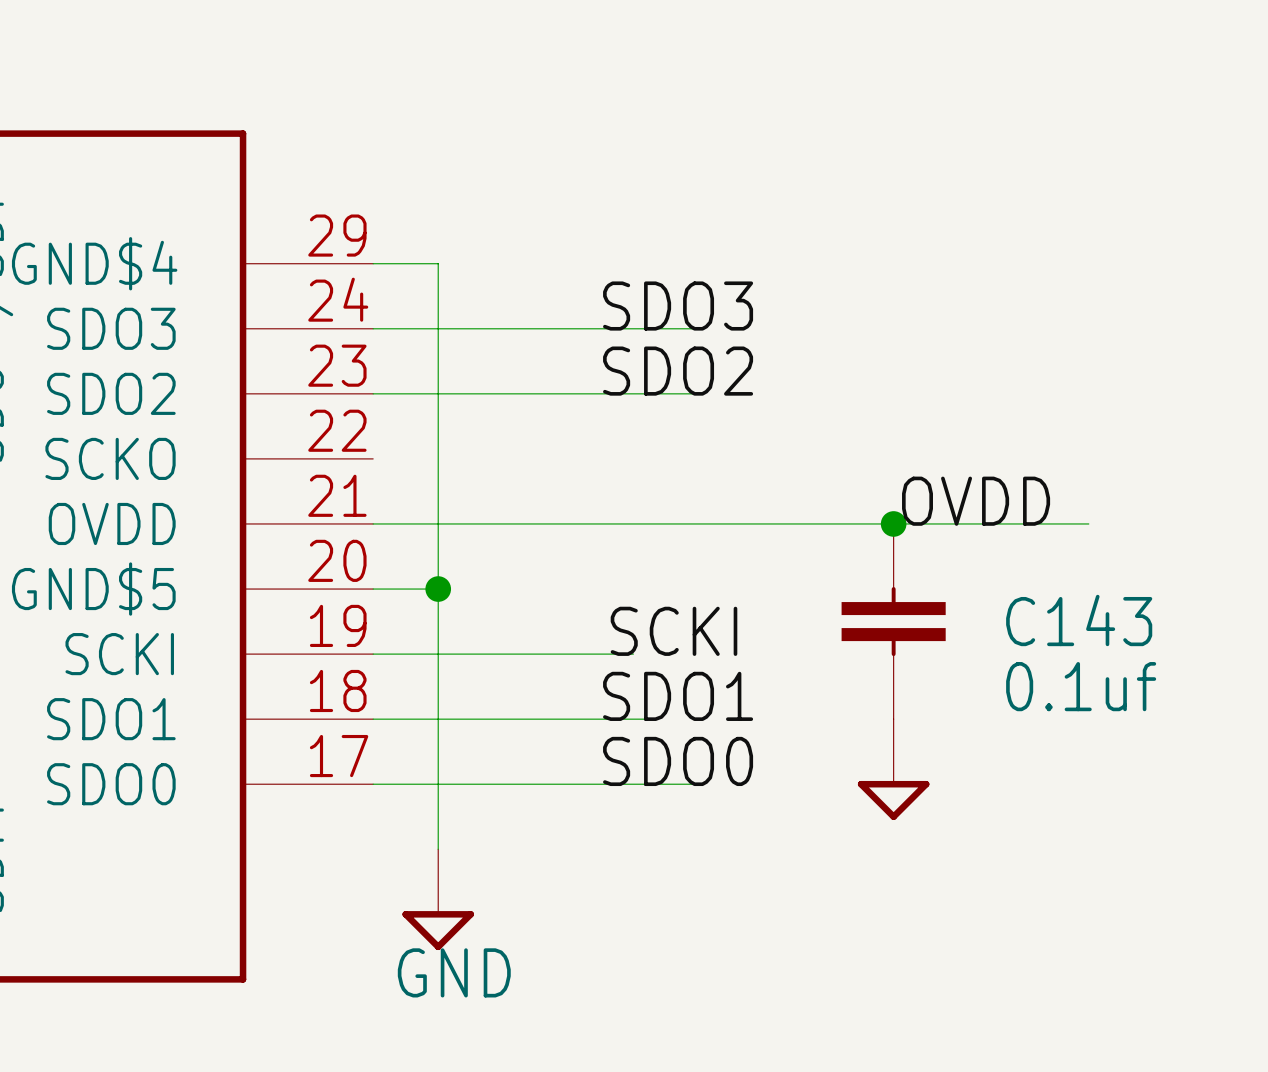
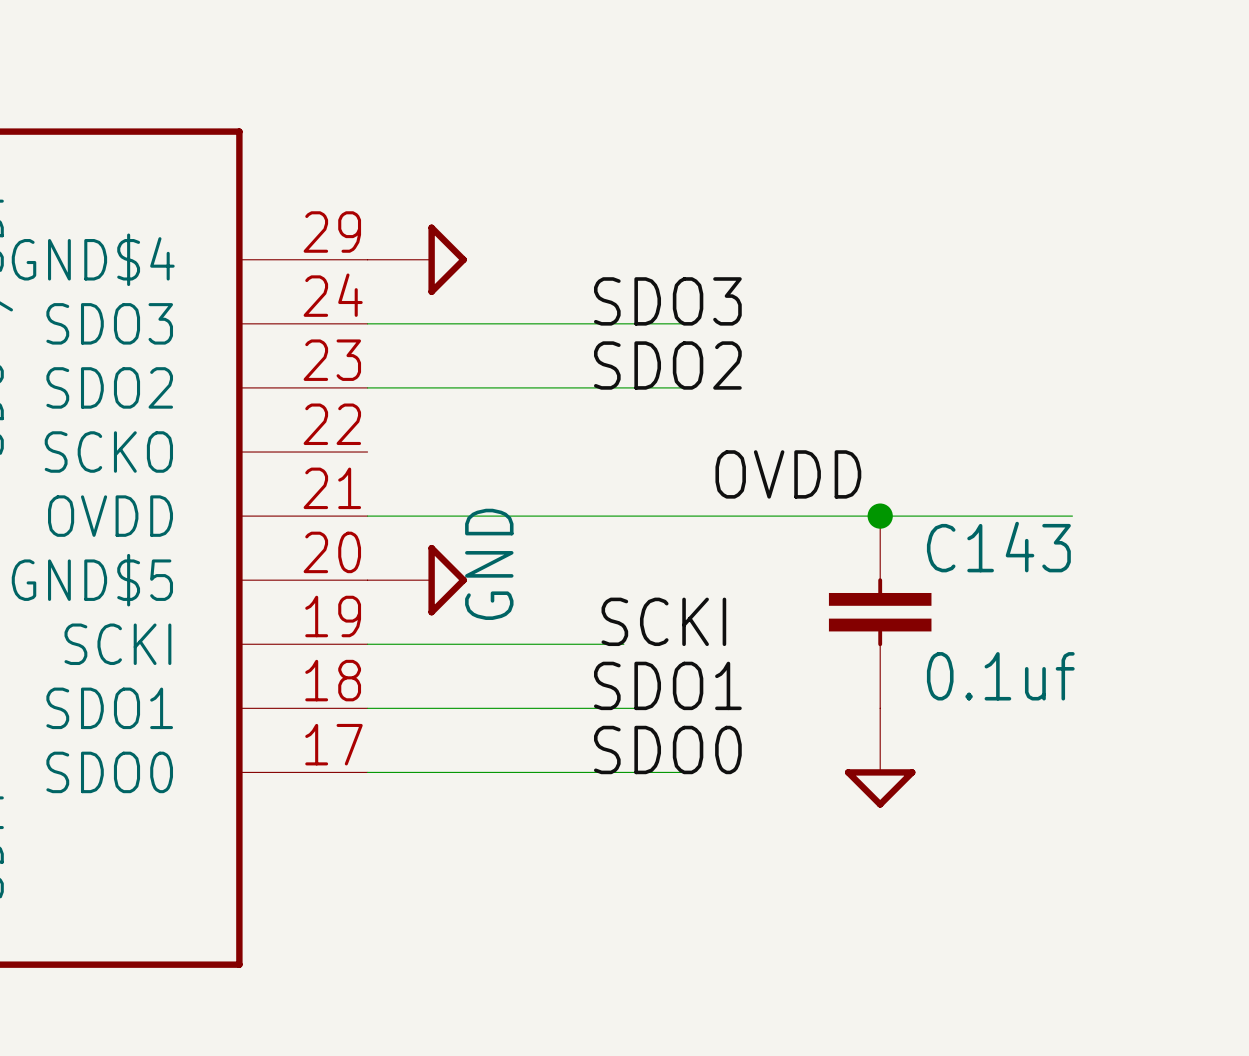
wire: (373, 263) (438, 263) (438, 849) -> none
power symbol: none -> (417, 259)
label position: OVDD (976, 501) -> OVDD (788, 474)
junction: (438, 589) -> none
C143 name position: C143 (1079, 620) -> C143 (998, 547)
C143 value position: 0.1uf (1081, 686) -> 0.1uf (1000, 676)
power symbol position: GND (438, 899) -> GND (417, 580)
power symbol rotation: 0° (438, 930) -> 90° counterclockwise (447, 580)

